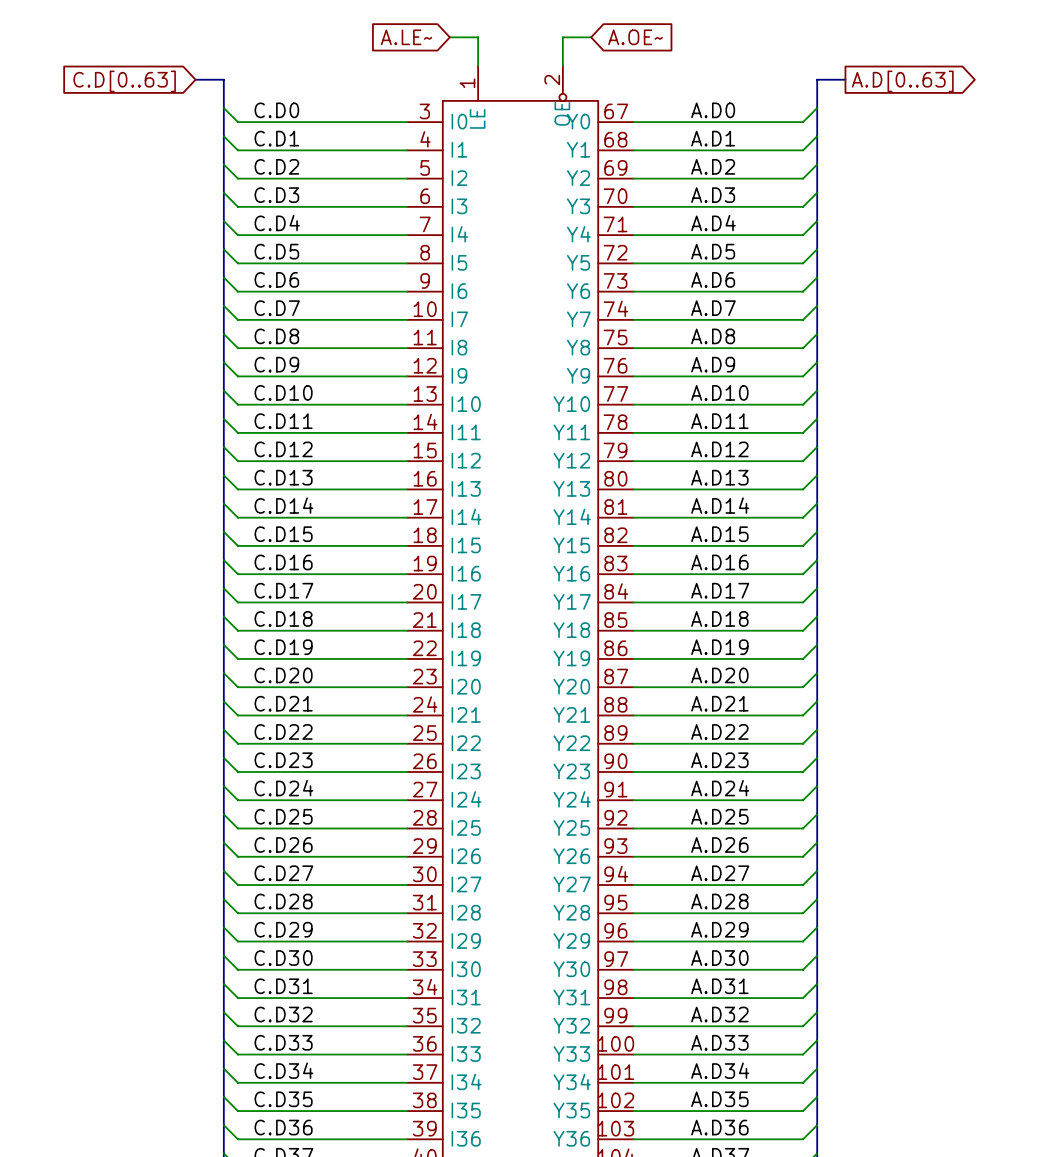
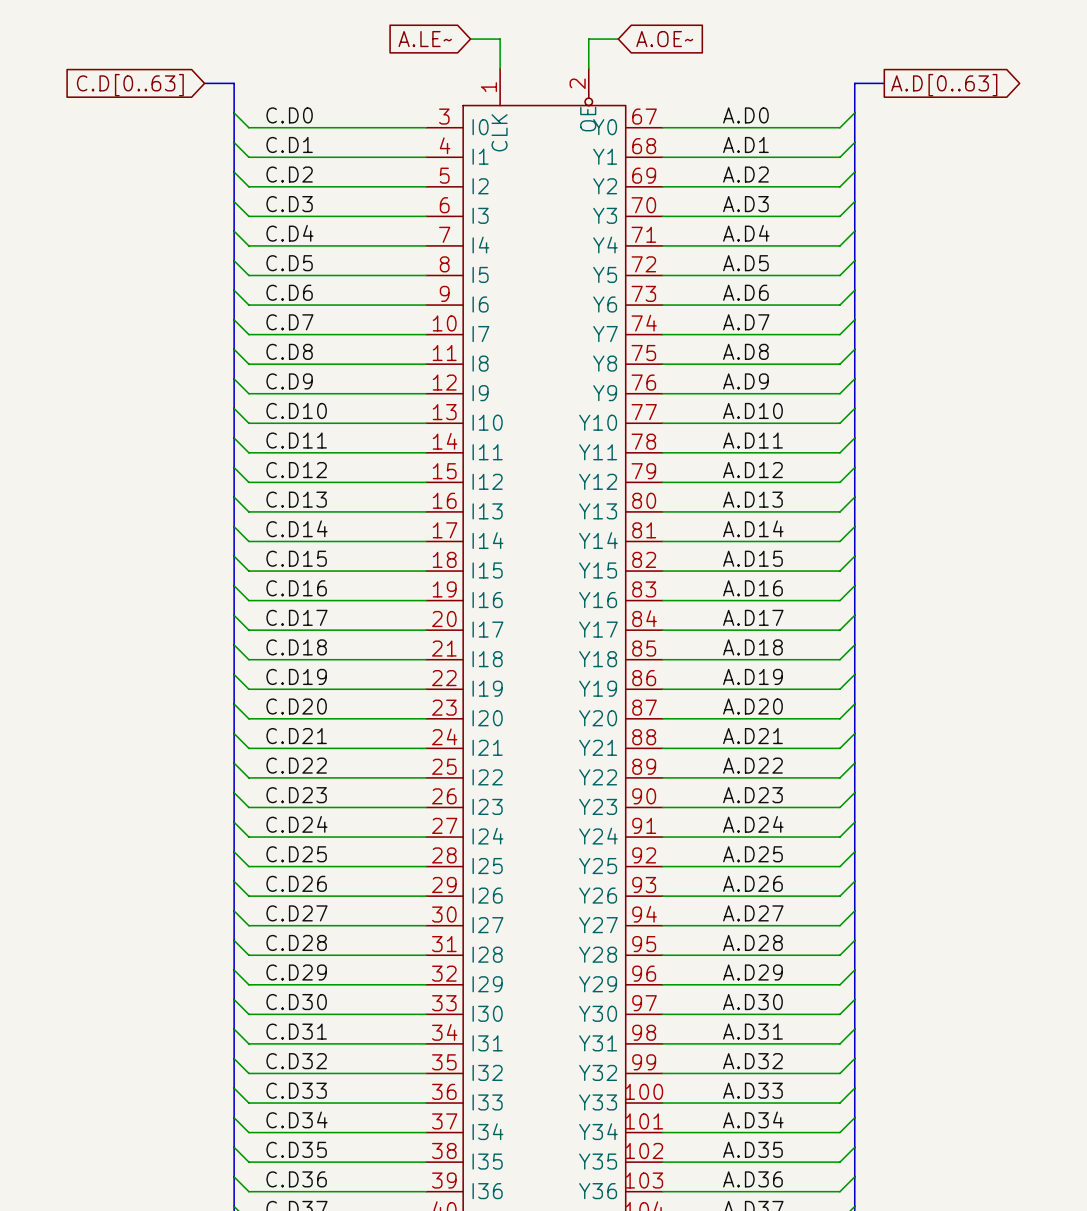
part pin name: LE (477, 118) -> CLK (499, 132)

